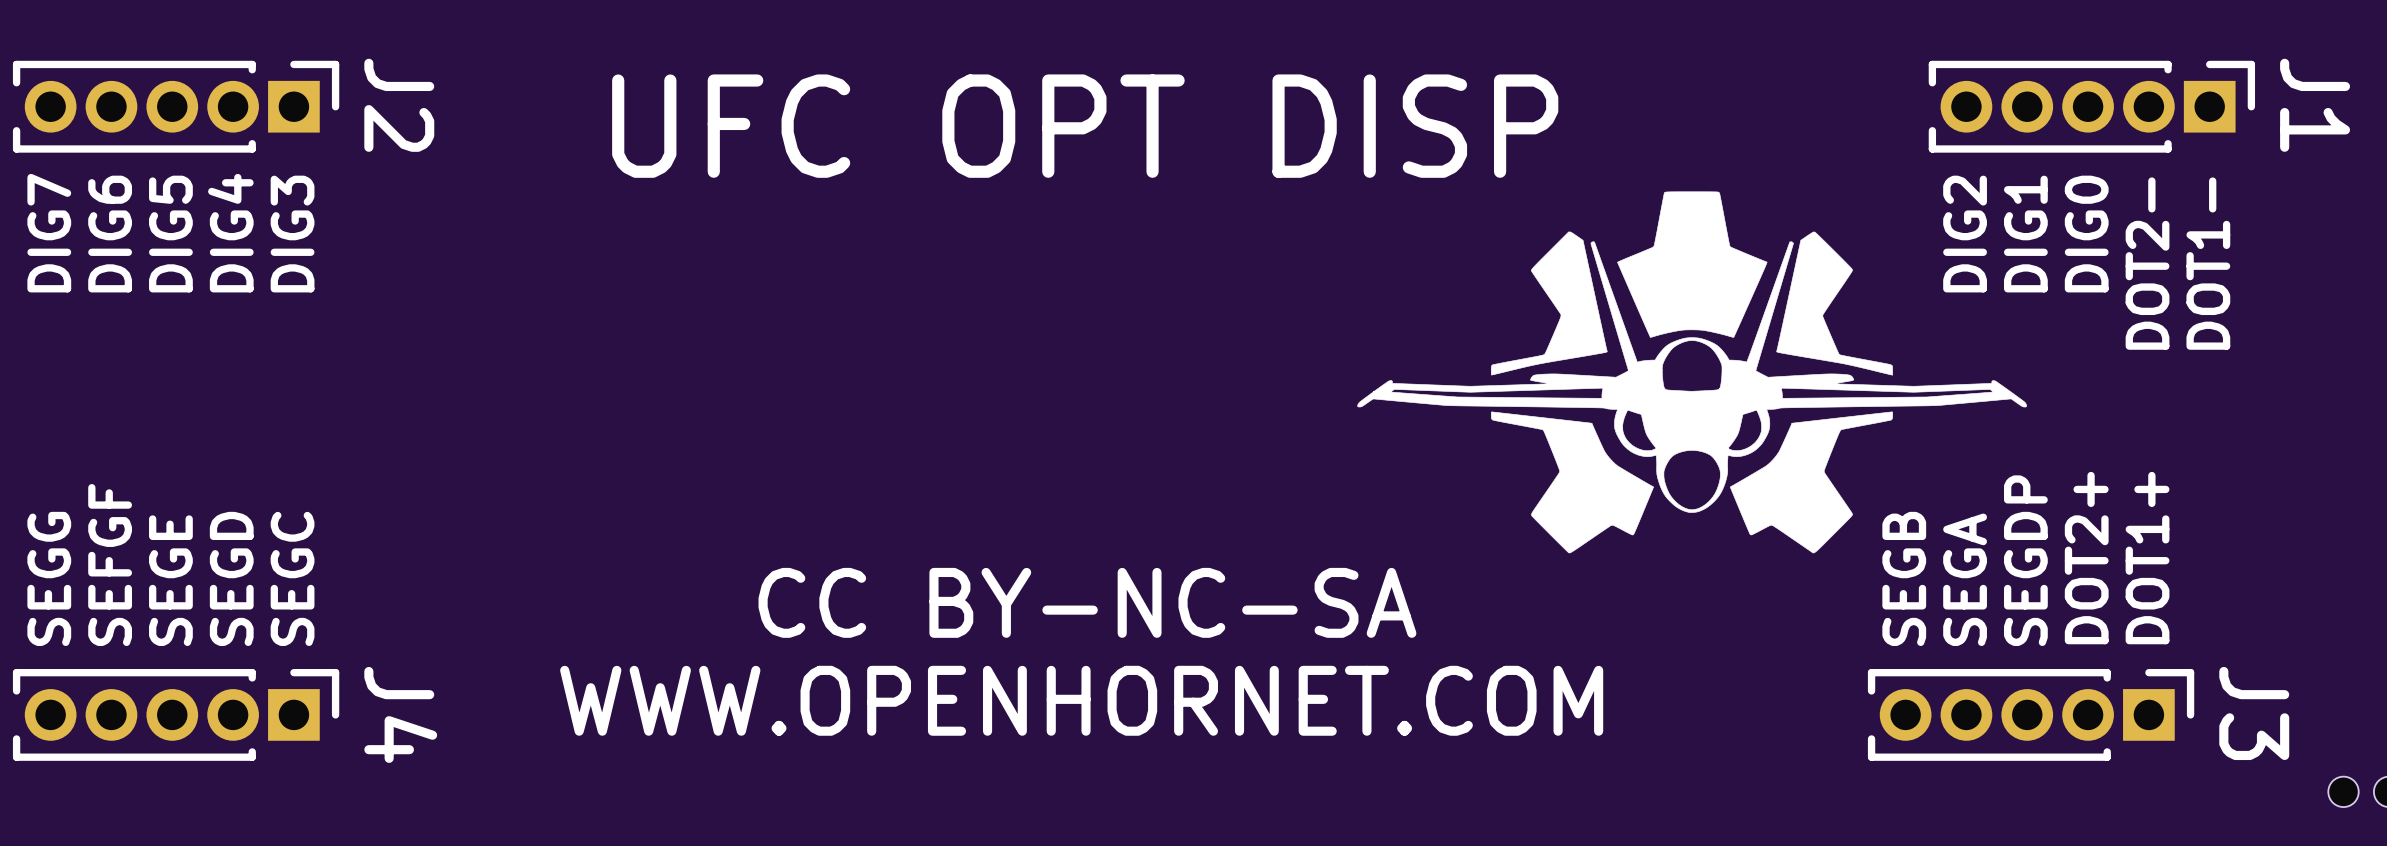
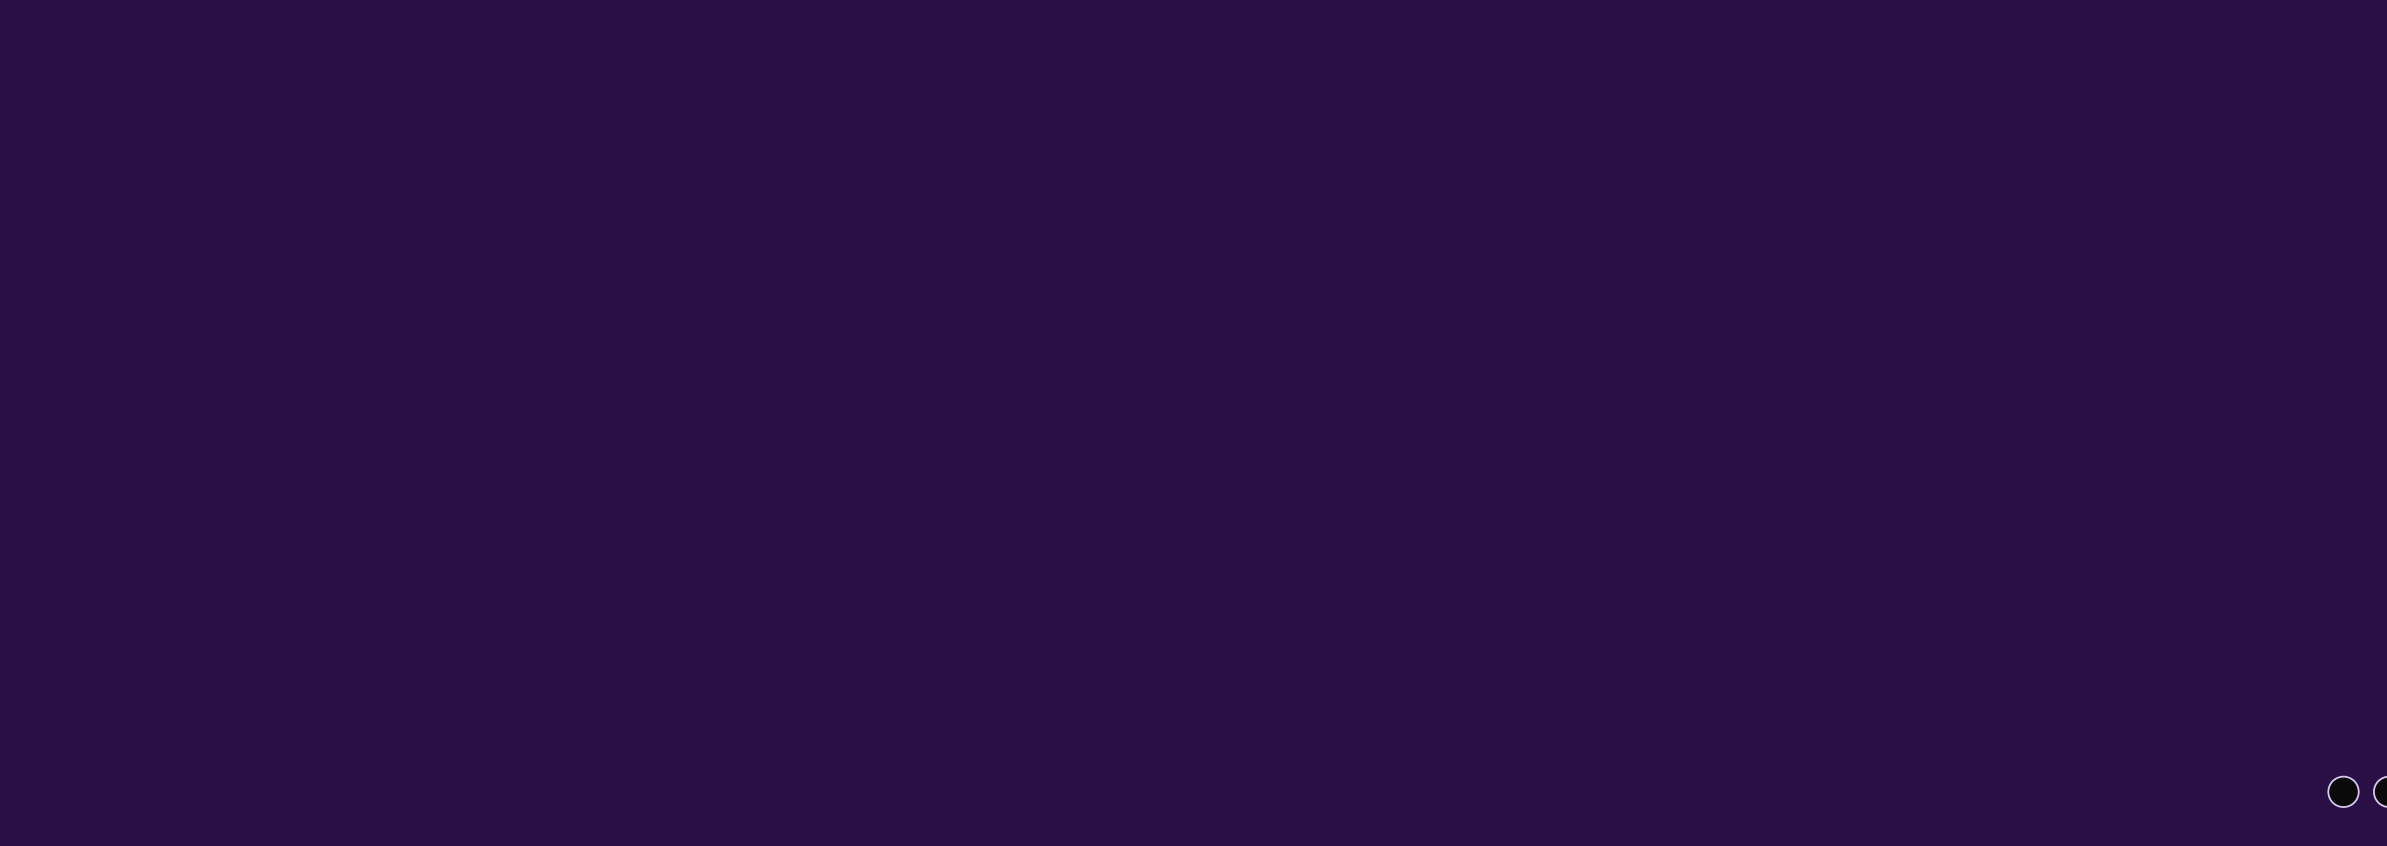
J2: (176, 106) -> none
J1: (2091, 106) -> none
text: UFC OPT DISP (1085, 126) -> none
drawing: [1357, 191, 2027, 554] -> none
text: DIG7 (49, 233) -> none
text: DIG4 (230, 233) -> none
text: DIG6 (110, 234) -> none
text: DIG5 (170, 234) -> none
text: DIG3 (292, 234) -> none
text: DIG2 (1965, 234) -> none
text: DIG1 (2025, 234) -> none
text: DIG0 (2086, 234) -> none
text: DOT2- (2147, 263) -> none
text: DOT1- (2208, 263) -> none
text: DOT2+ (2086, 558) -> none
text: DOT1+ (2147, 558) -> none
text: SEGDP (2025, 560) -> none
text: SEFGF (110, 565) -> none
text: SEGG (49, 578) -> none
text: SEGD (231, 578) -> none
text: SEGC (292, 578) -> none
text: SEGB (1904, 578) -> none
text: SEGA (1965, 579) -> none
text: SEGE (170, 580) -> none
text: CC BY-NC-SA (1087, 602) -> none
text: WWW.OPENHORNET.COM (1081, 700) -> none
J4: (176, 714) -> none
J3: (2031, 714) -> none

